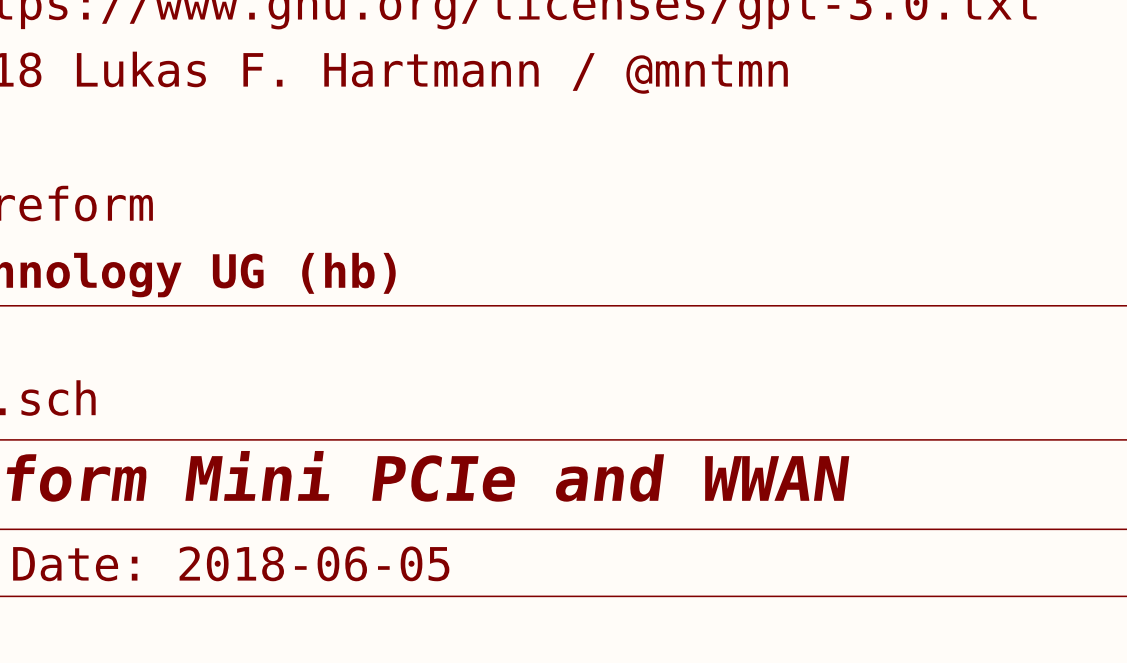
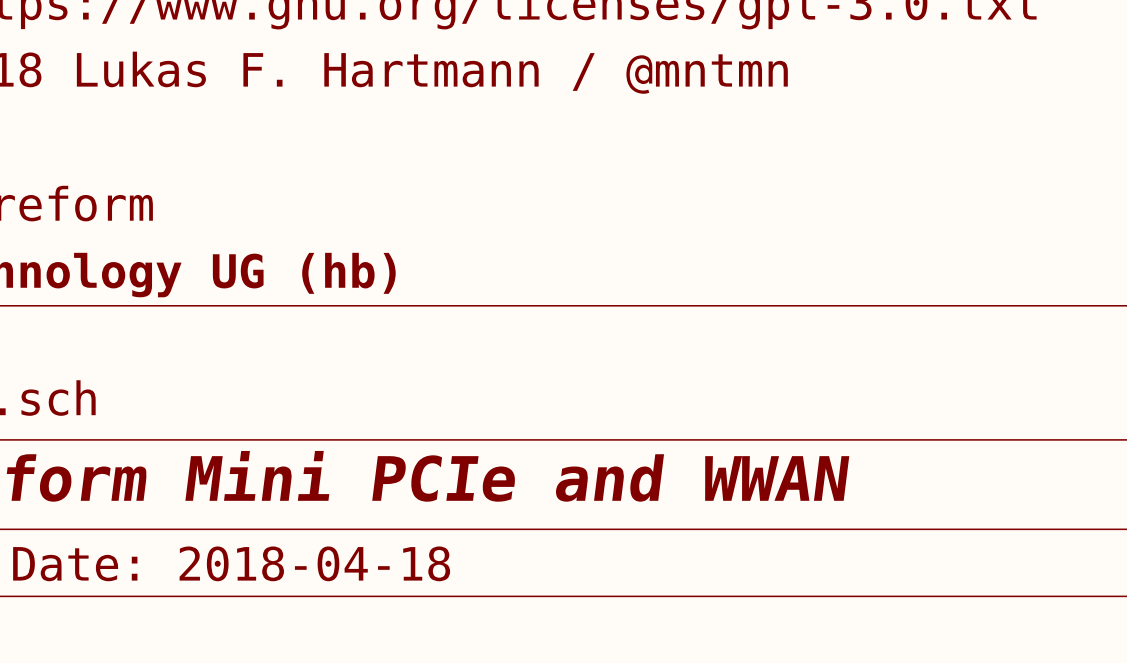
title block: Date: 2018-06-05 (231, 563) -> Date: 2018-04-18 (231, 563)

